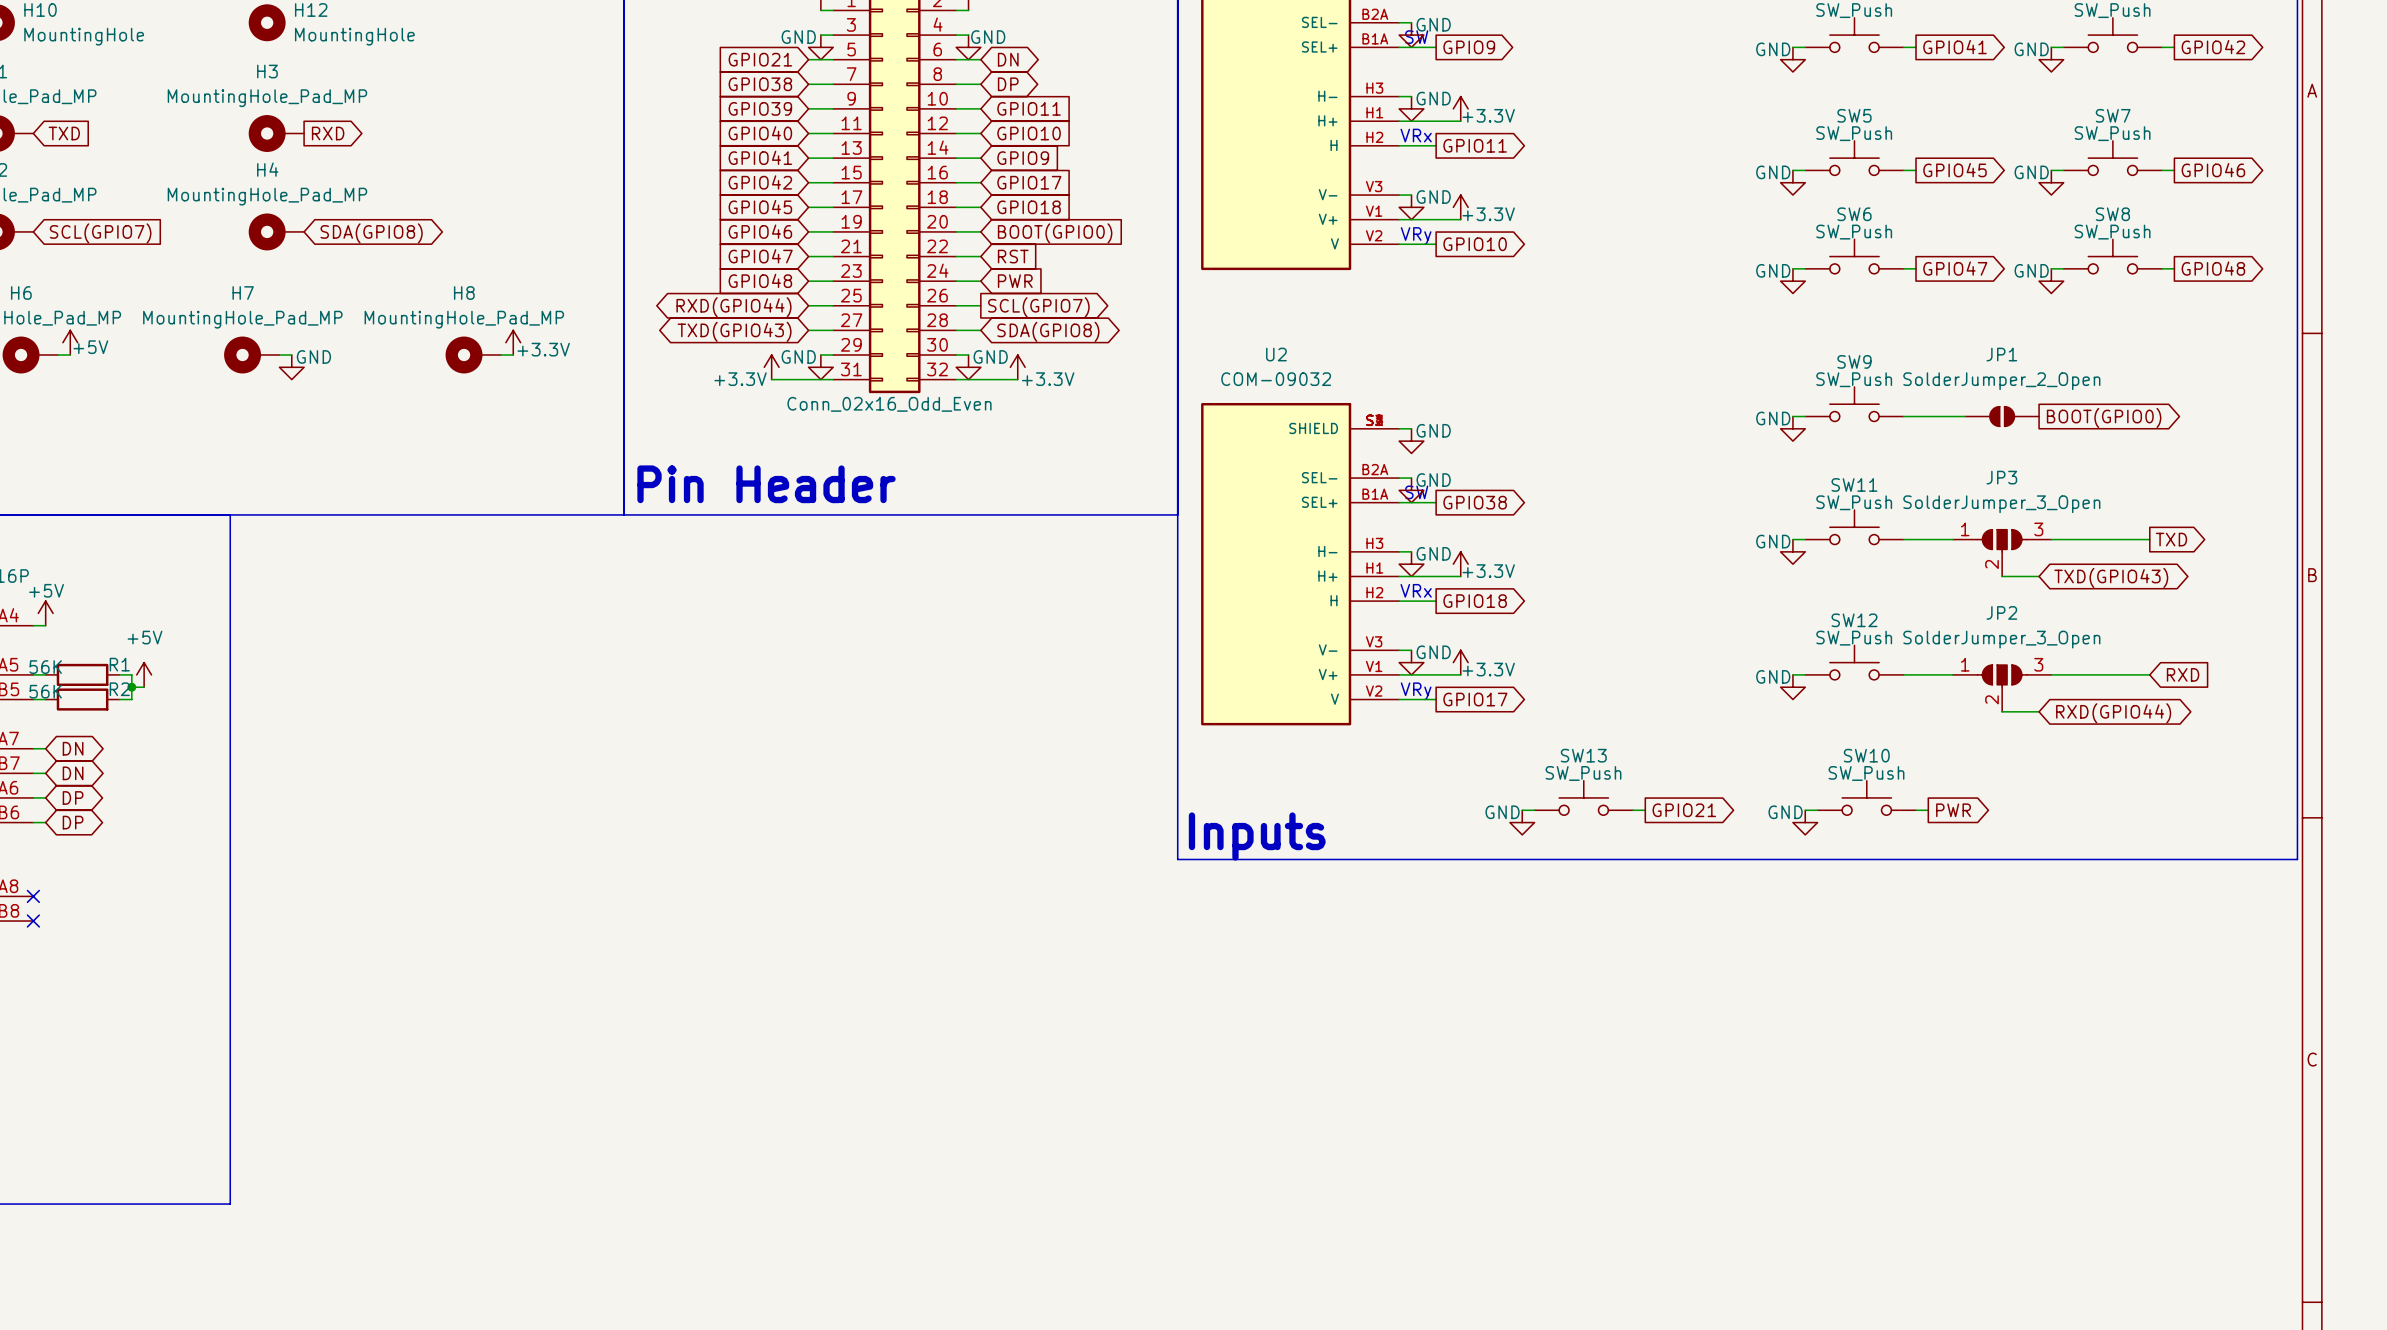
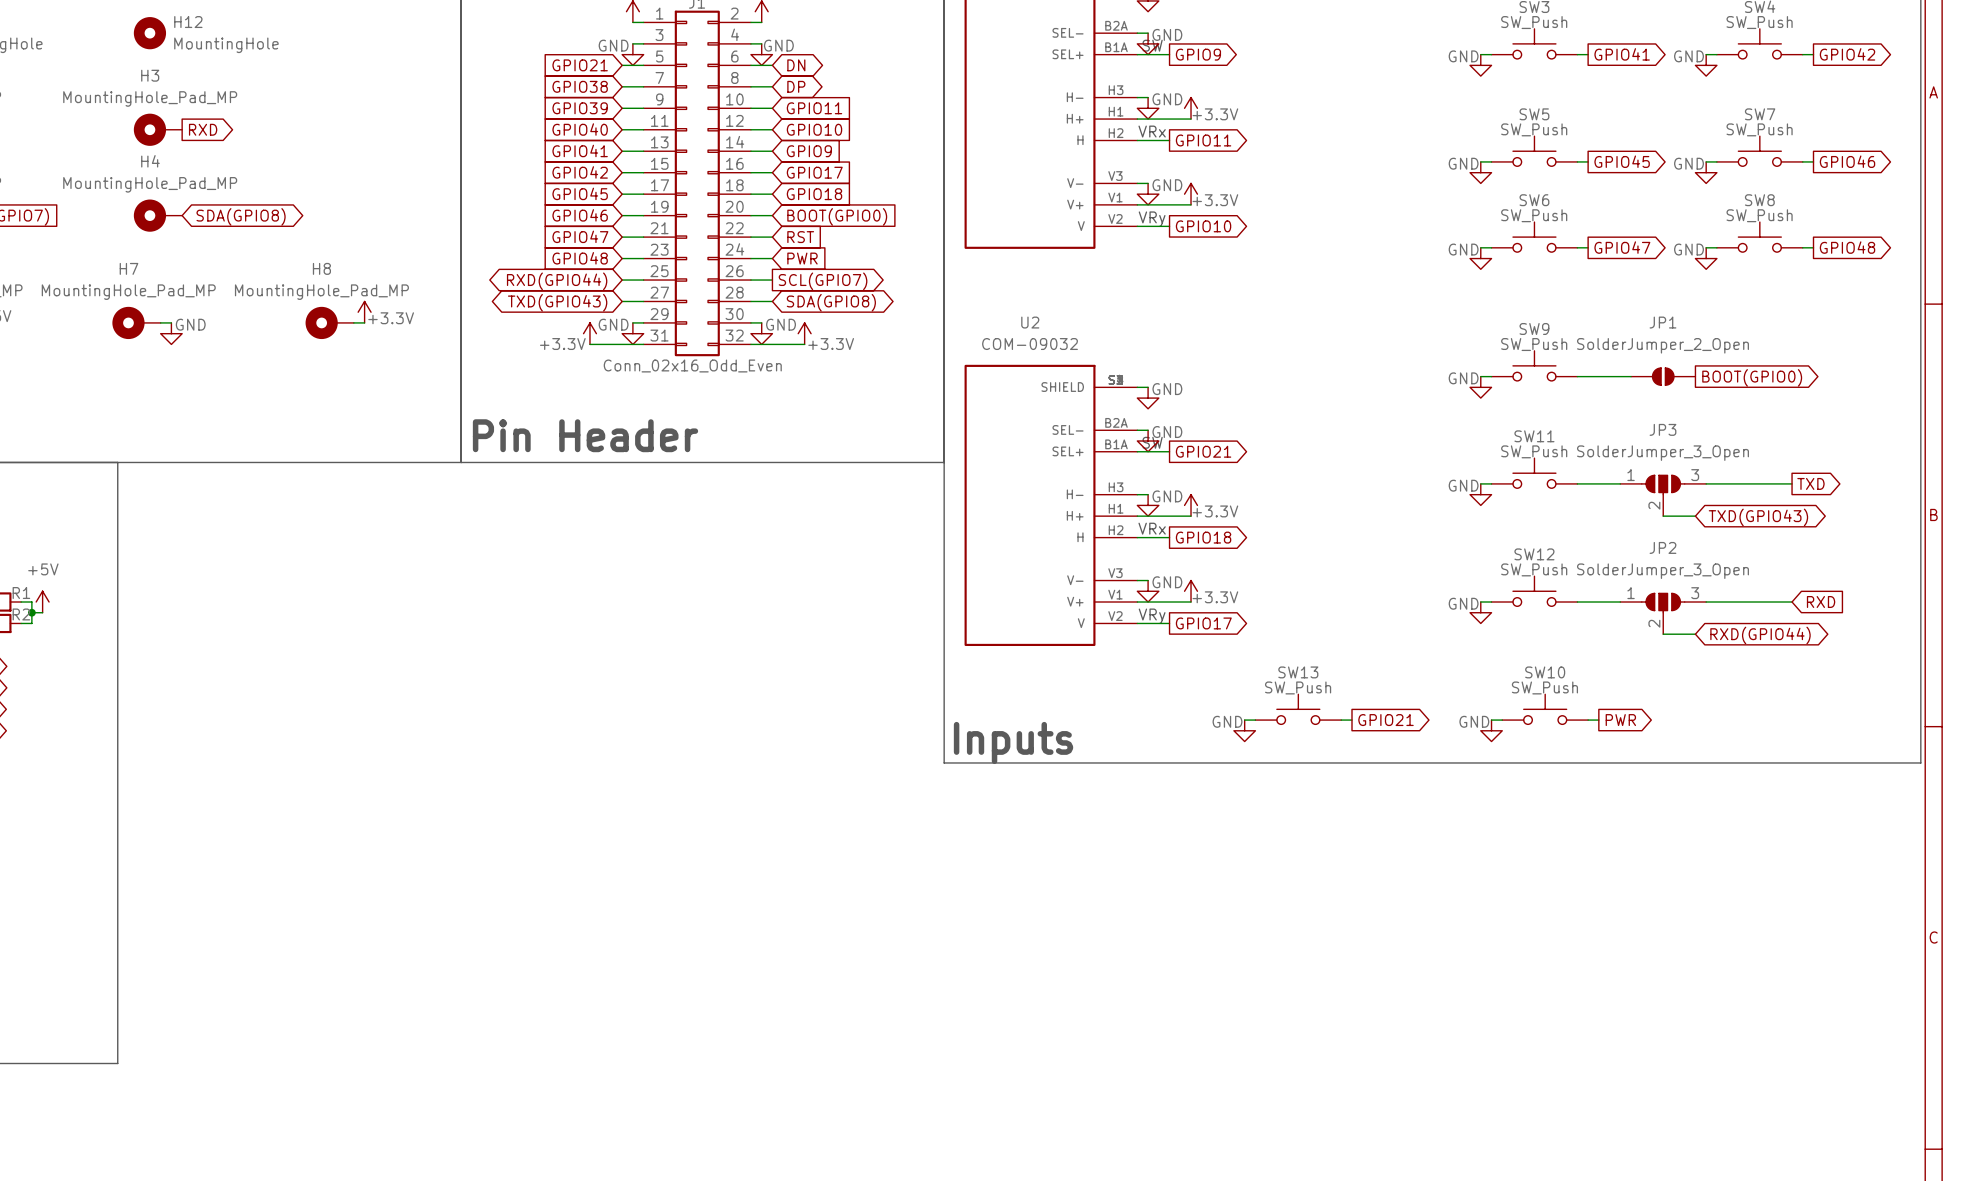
global label: GPIO38 (1475, 502) -> GPIO21 (1203, 451)

